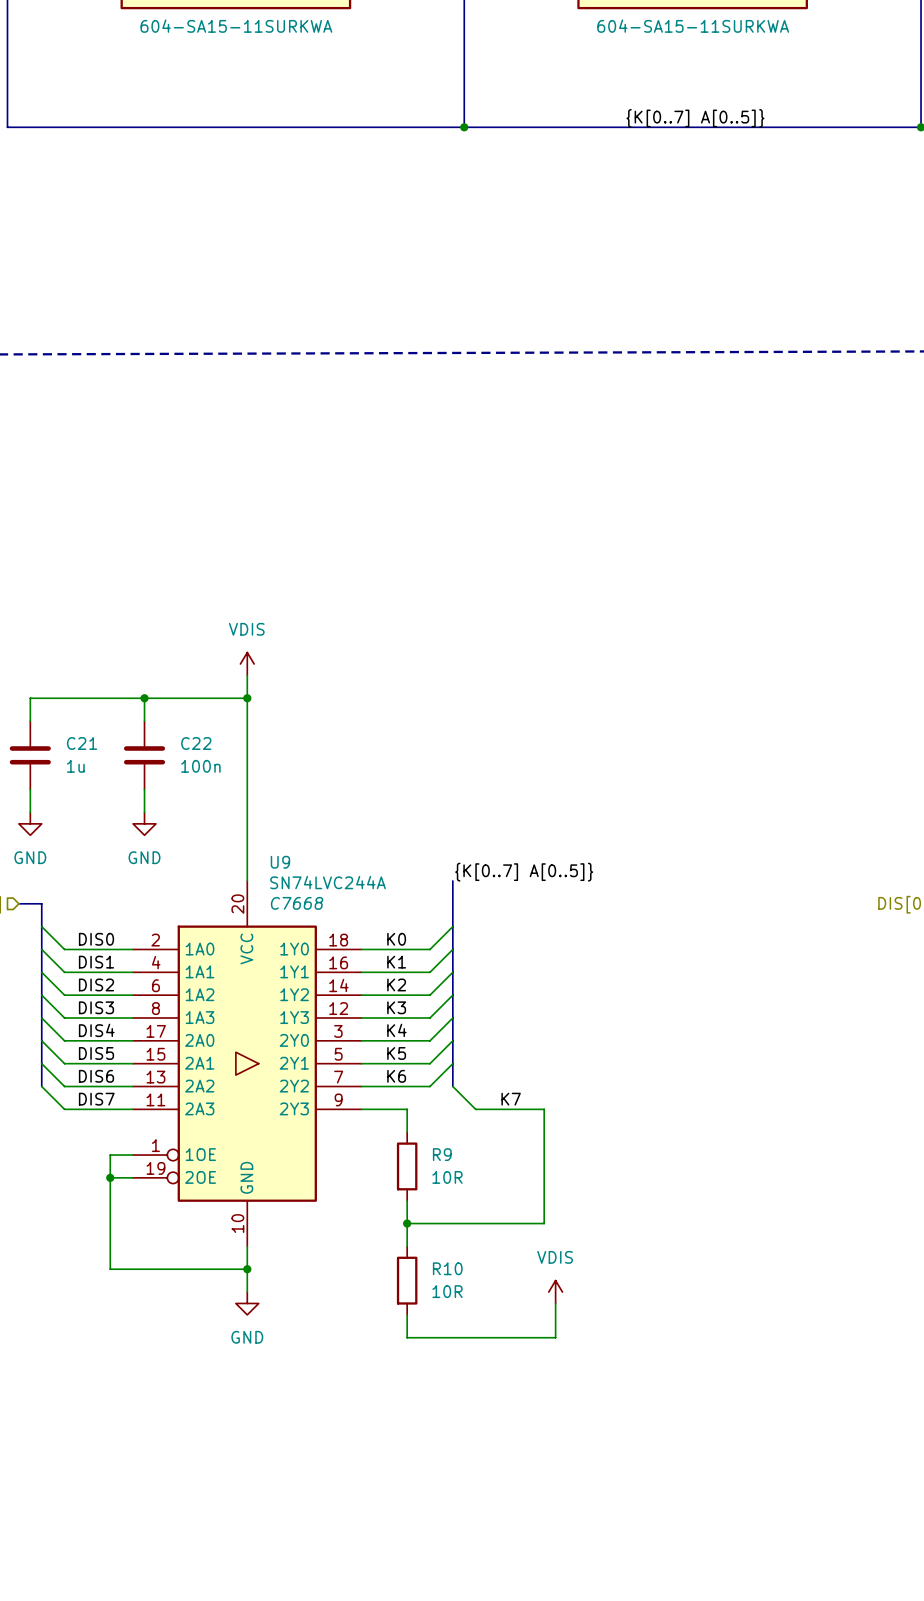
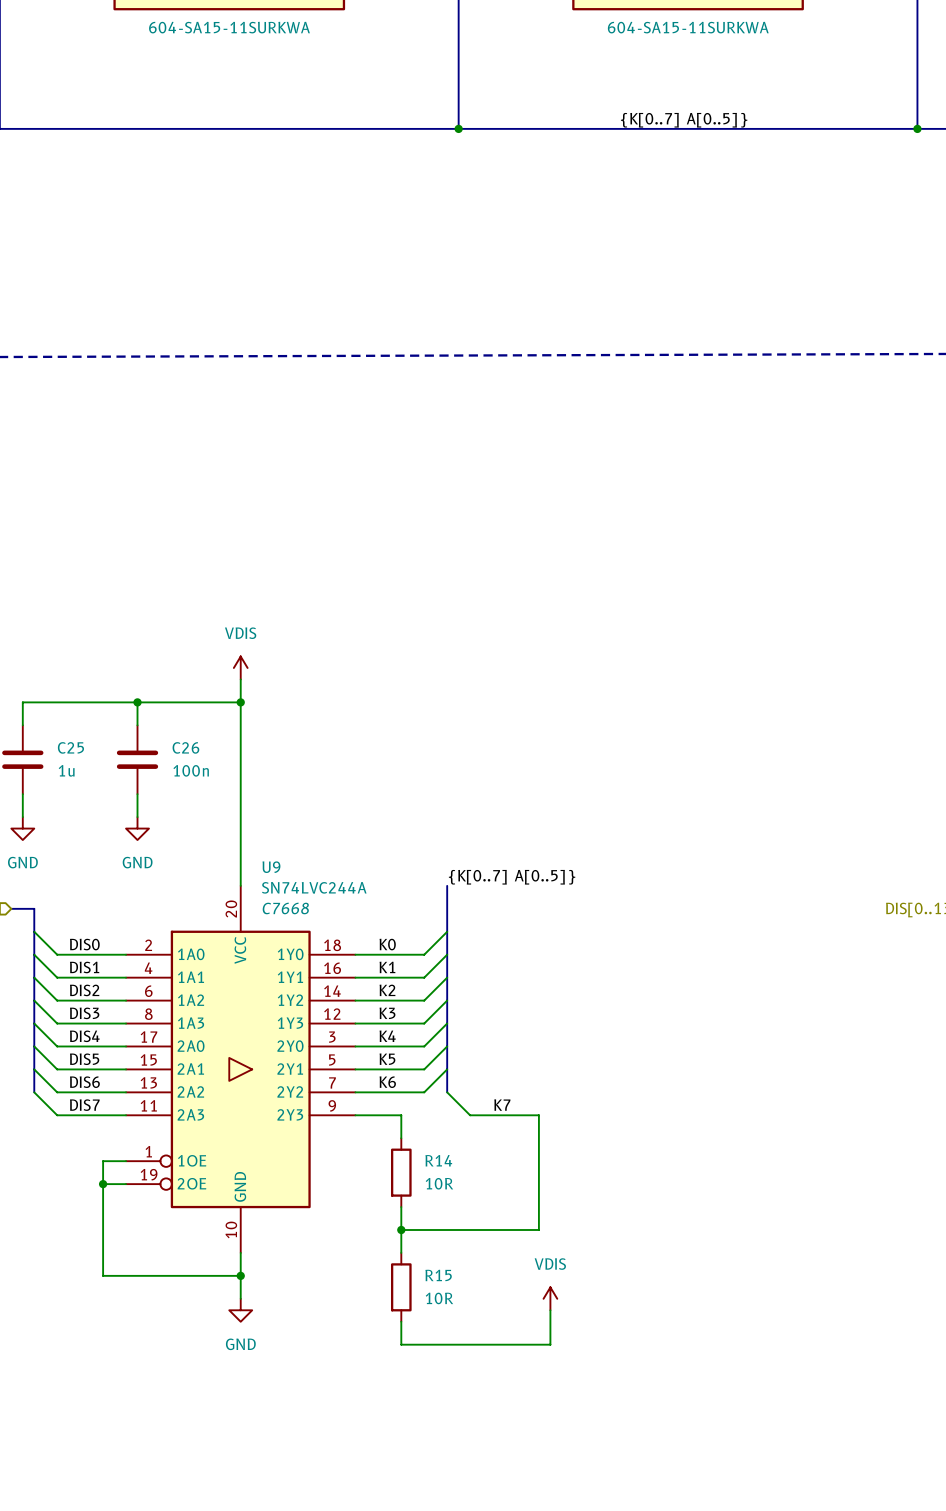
C21 name: C21 (82, 743) -> C25 (70, 747)
C22 name: C22 (196, 743) -> C26 (185, 747)
R9 name: R9 (442, 1154) -> R14 (438, 1160)
R10 name: R10 (447, 1268) -> R15 (438, 1275)

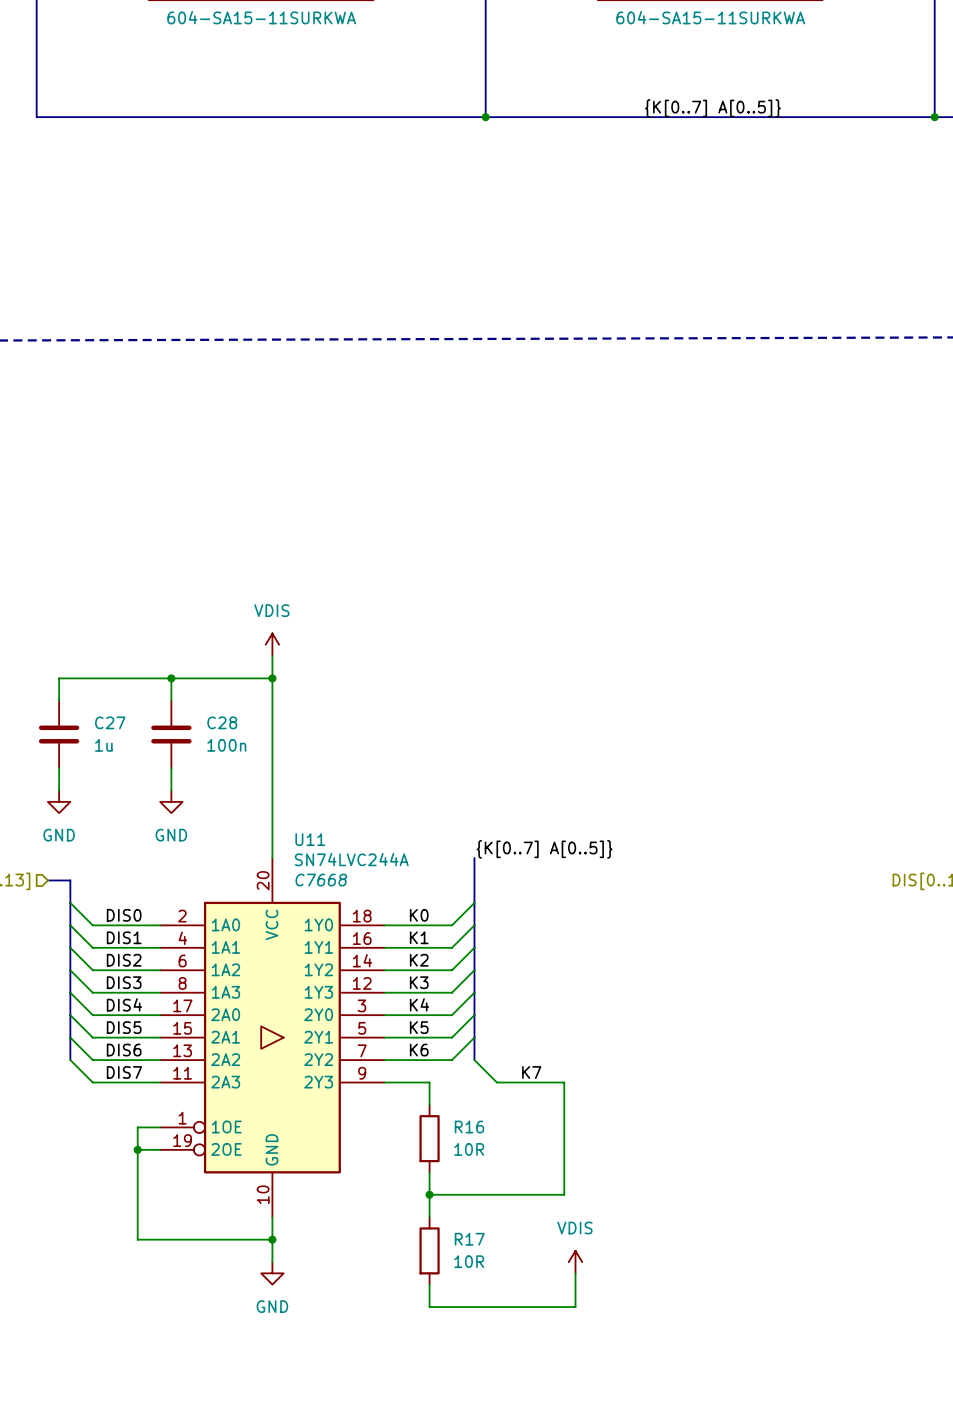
C25 name: C25 (70, 747) -> C27 (110, 722)
C26 name: C26 (185, 747) -> C28 (222, 722)
U9 name: U9 (271, 867) -> U11 (310, 839)
R14 name: R14 (438, 1160) -> R16 (469, 1127)
R15 name: R15 (438, 1275) -> R17 (469, 1239)

